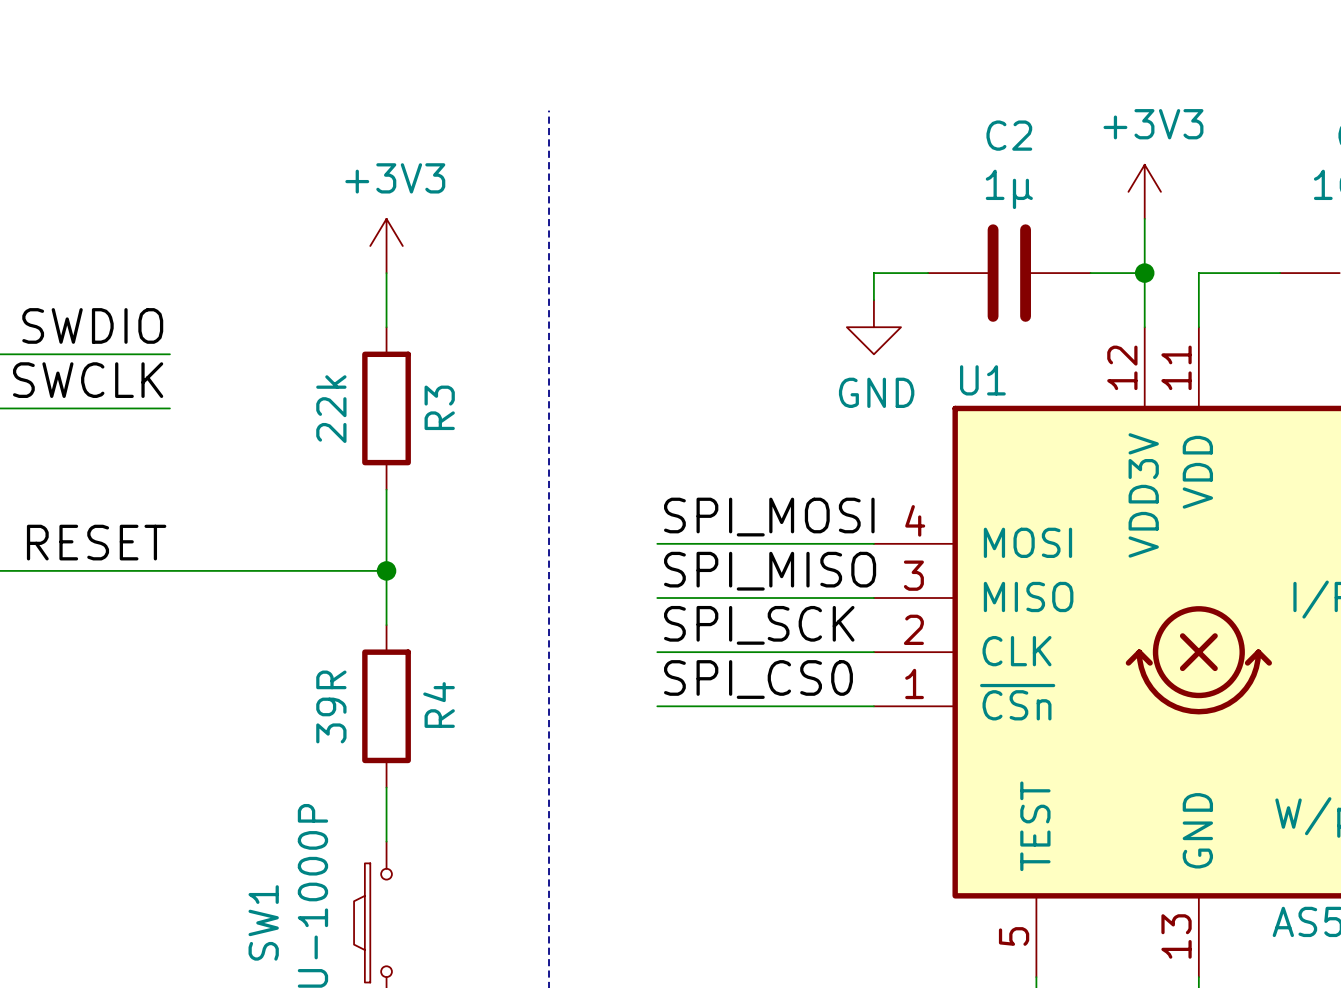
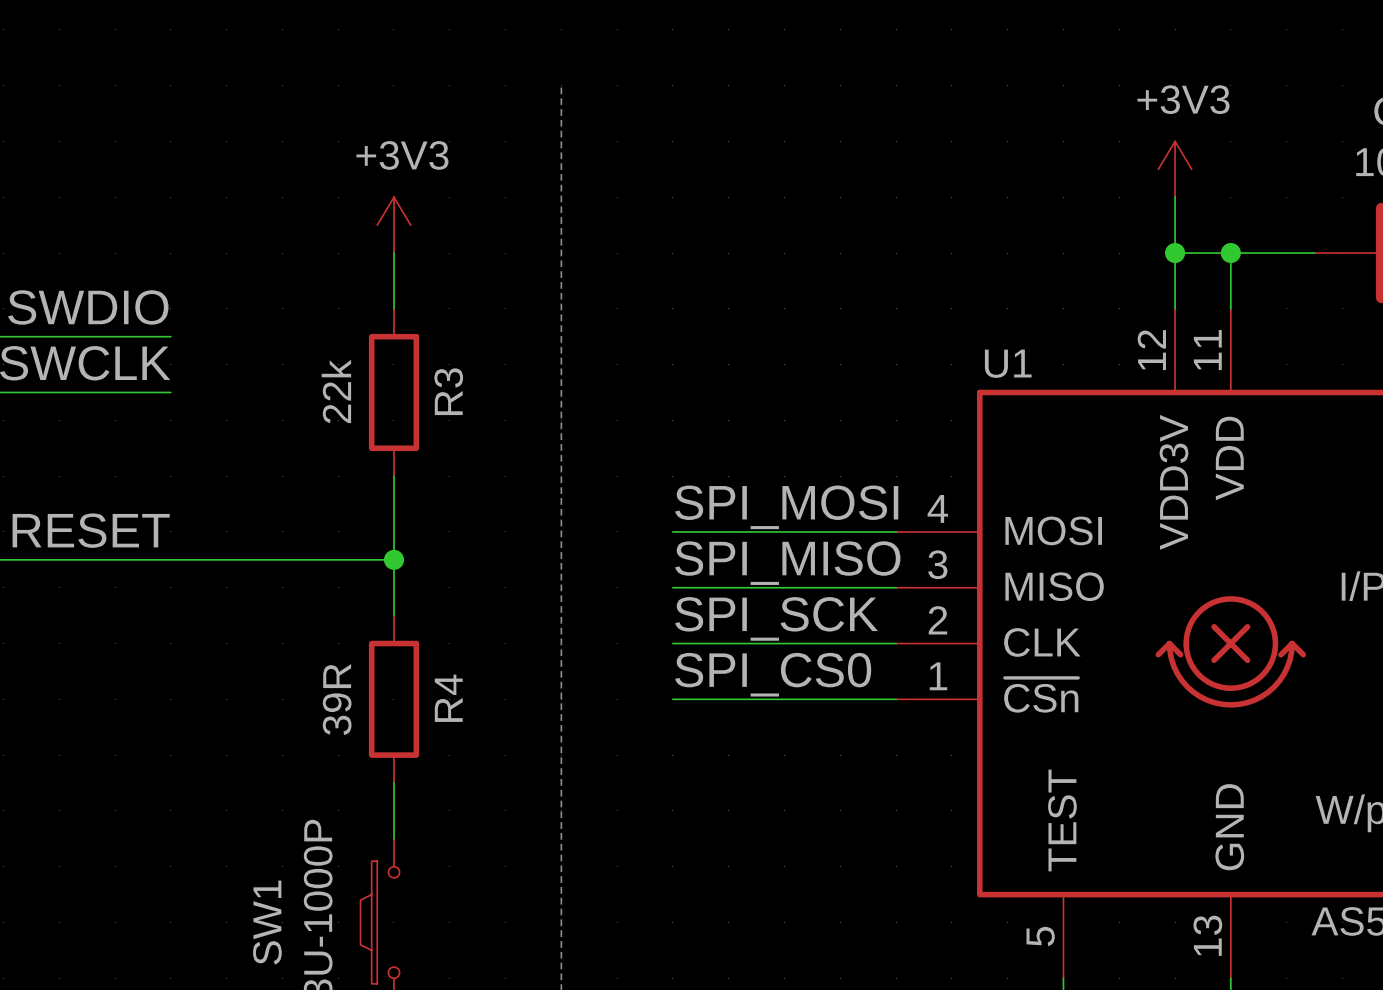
wire: (928, 273) (873, 273) (873, 300) -> none
C2: 1µ (1009, 273) -> none
wire: (1090, 273) (1144, 273) -> (1230, 253) (1175, 253)
junction: none -> (1230, 253)
power symbol: GND (873, 327) -> none

